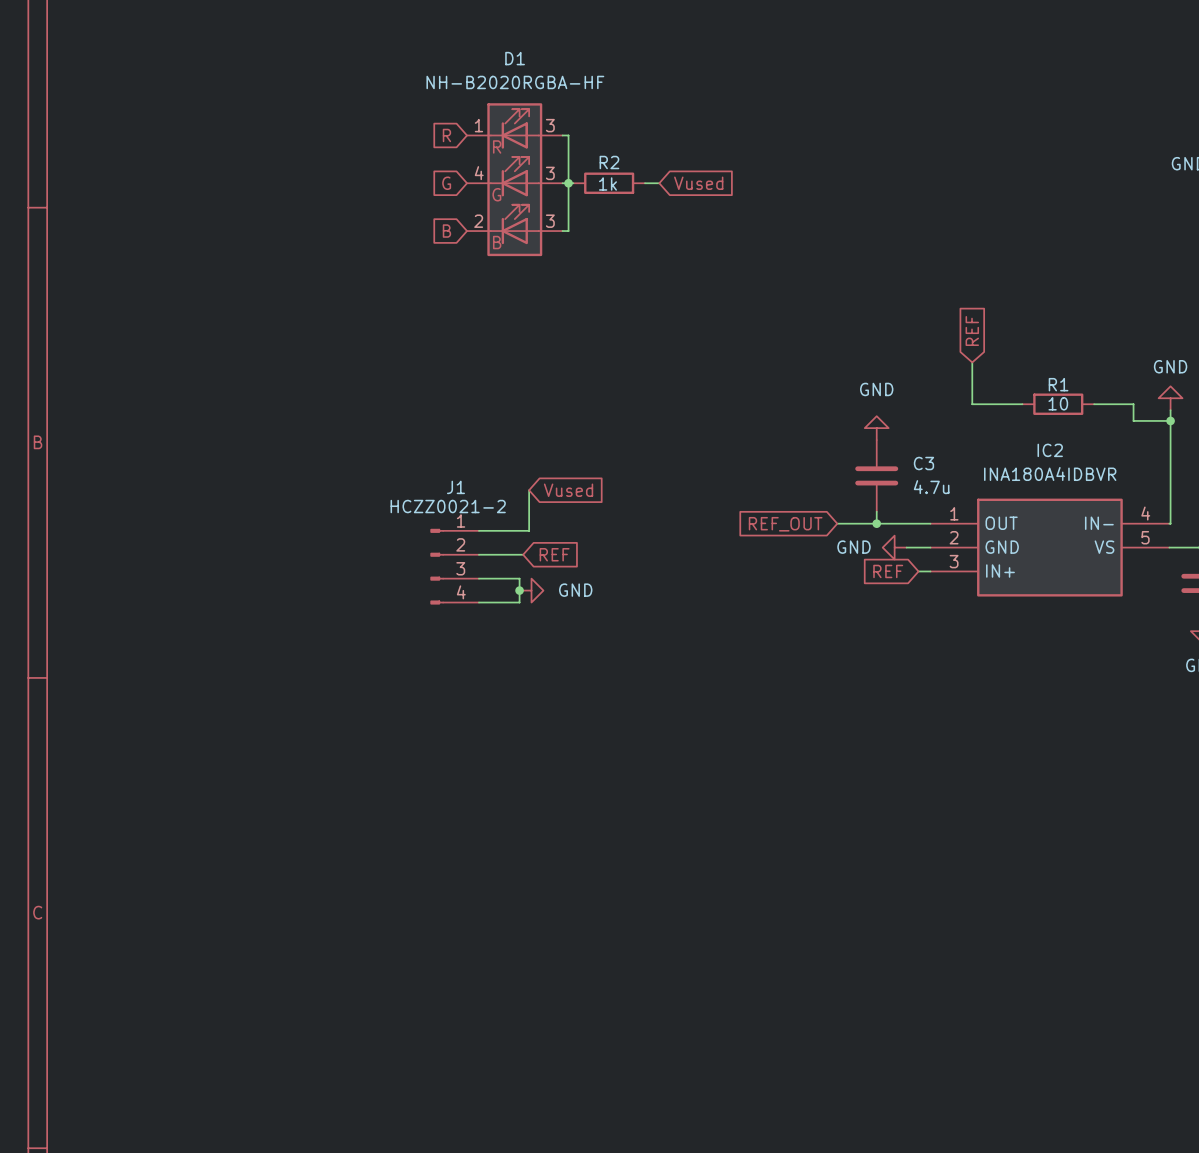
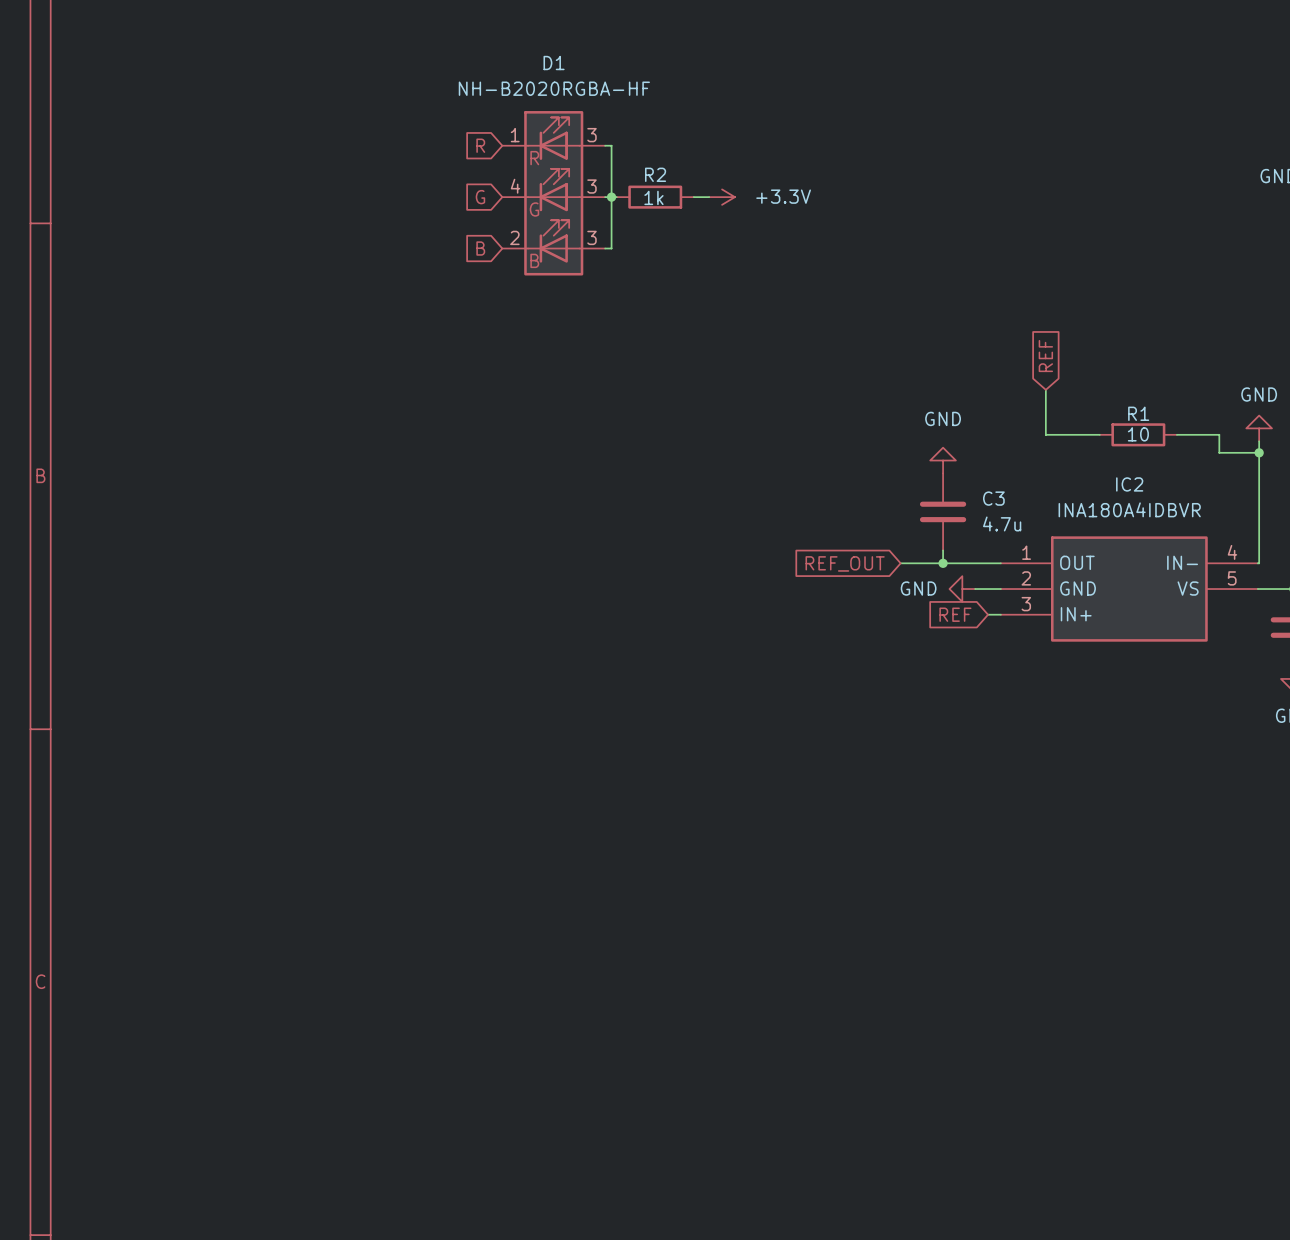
power symbol: none -> +3.3V (722, 197)
global label: Vused (698, 183) -> none
wire: (529, 490) (529, 530) (478, 530) -> none
global label: Vused (568, 490) -> none
wire: (478, 554) (523, 554) -> none
global label: REF (554, 554) -> none
J1: HCZZ0021-2 (454, 566) -> none
wire: (478, 578) (519, 578) (519, 602) (478, 602) -> none
junction: (519, 590) -> none
power symbol: GND (531, 590) -> none

